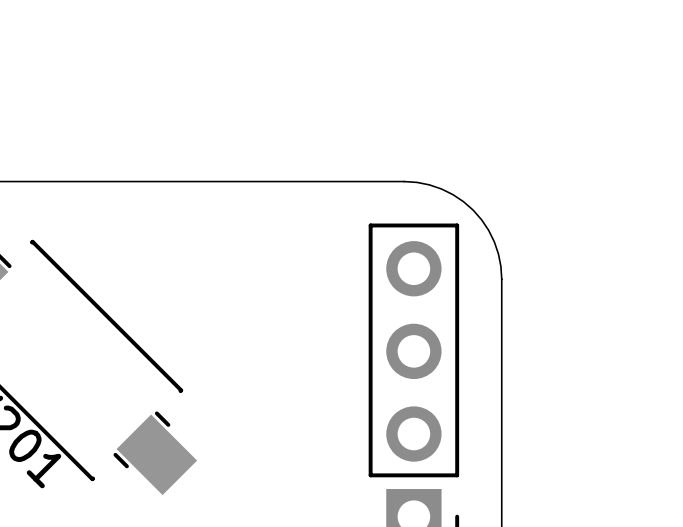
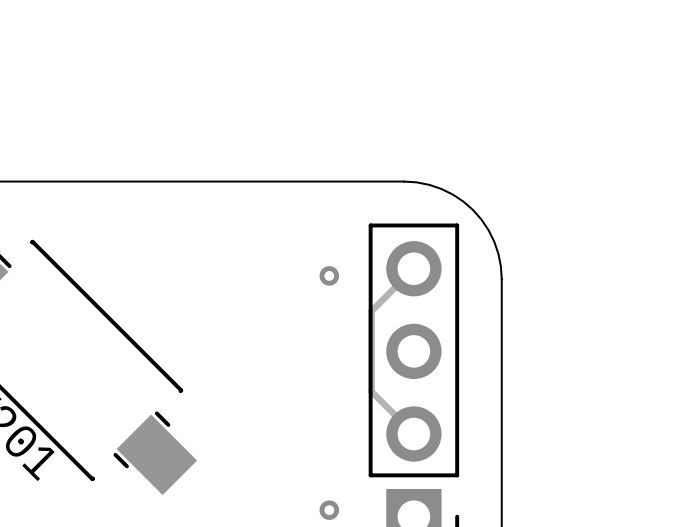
track: none -> (413, 268) (371, 311) (371, 391) (413, 434)
via: none -> (329, 275)
via: none -> (329, 510)

